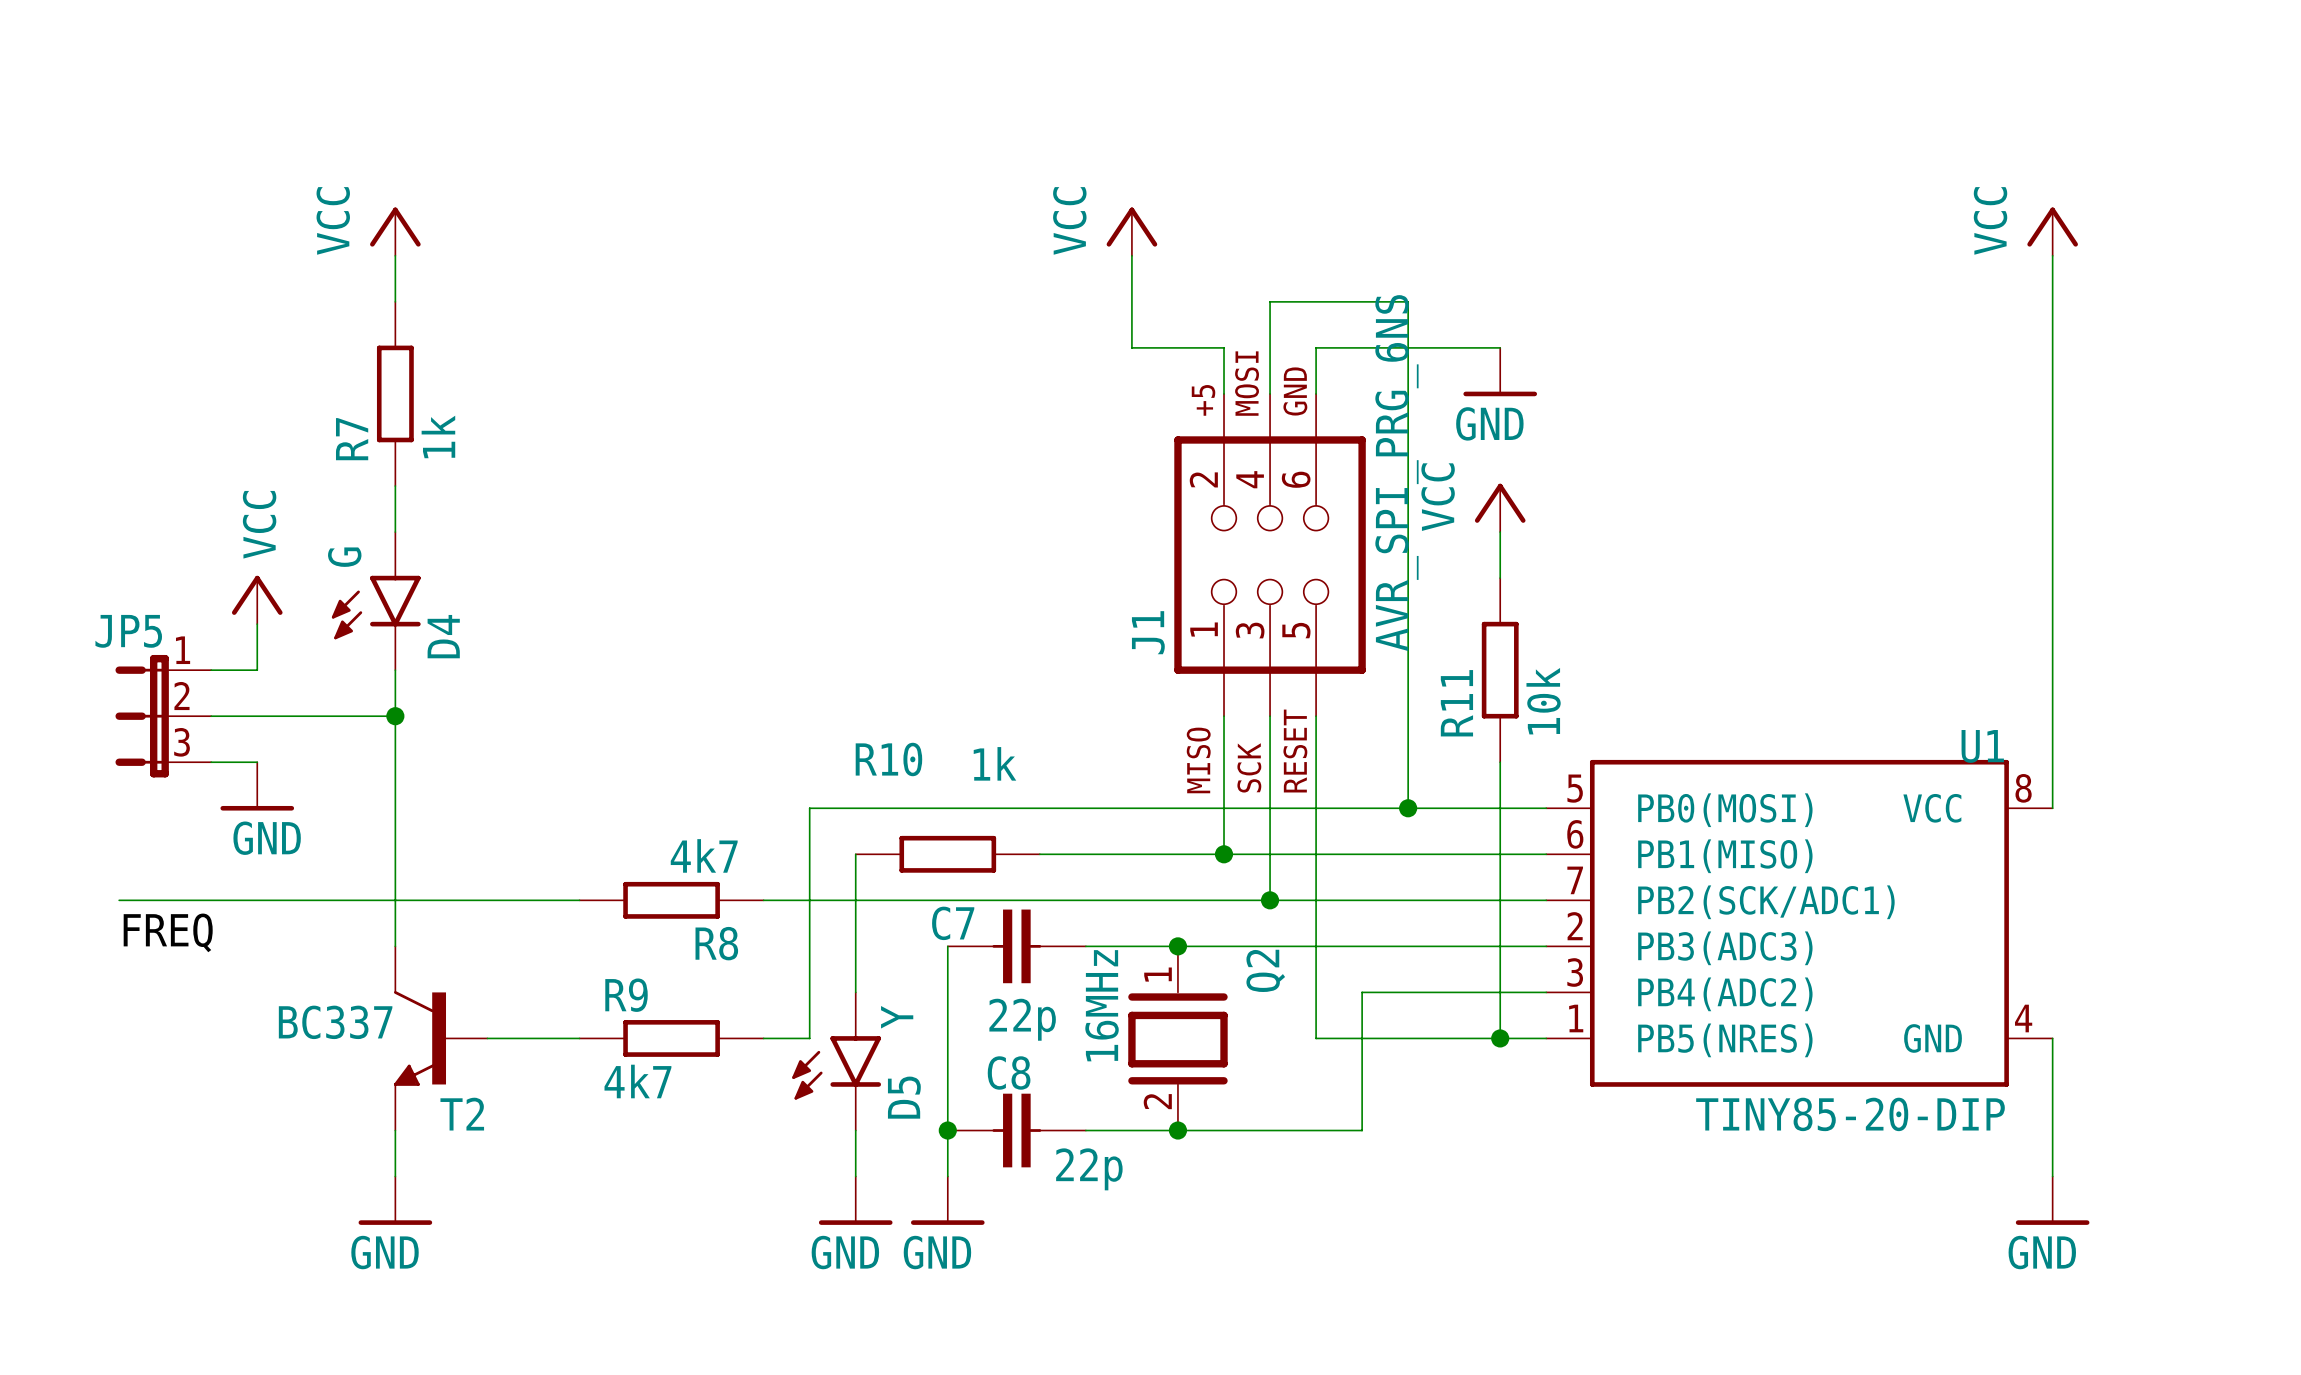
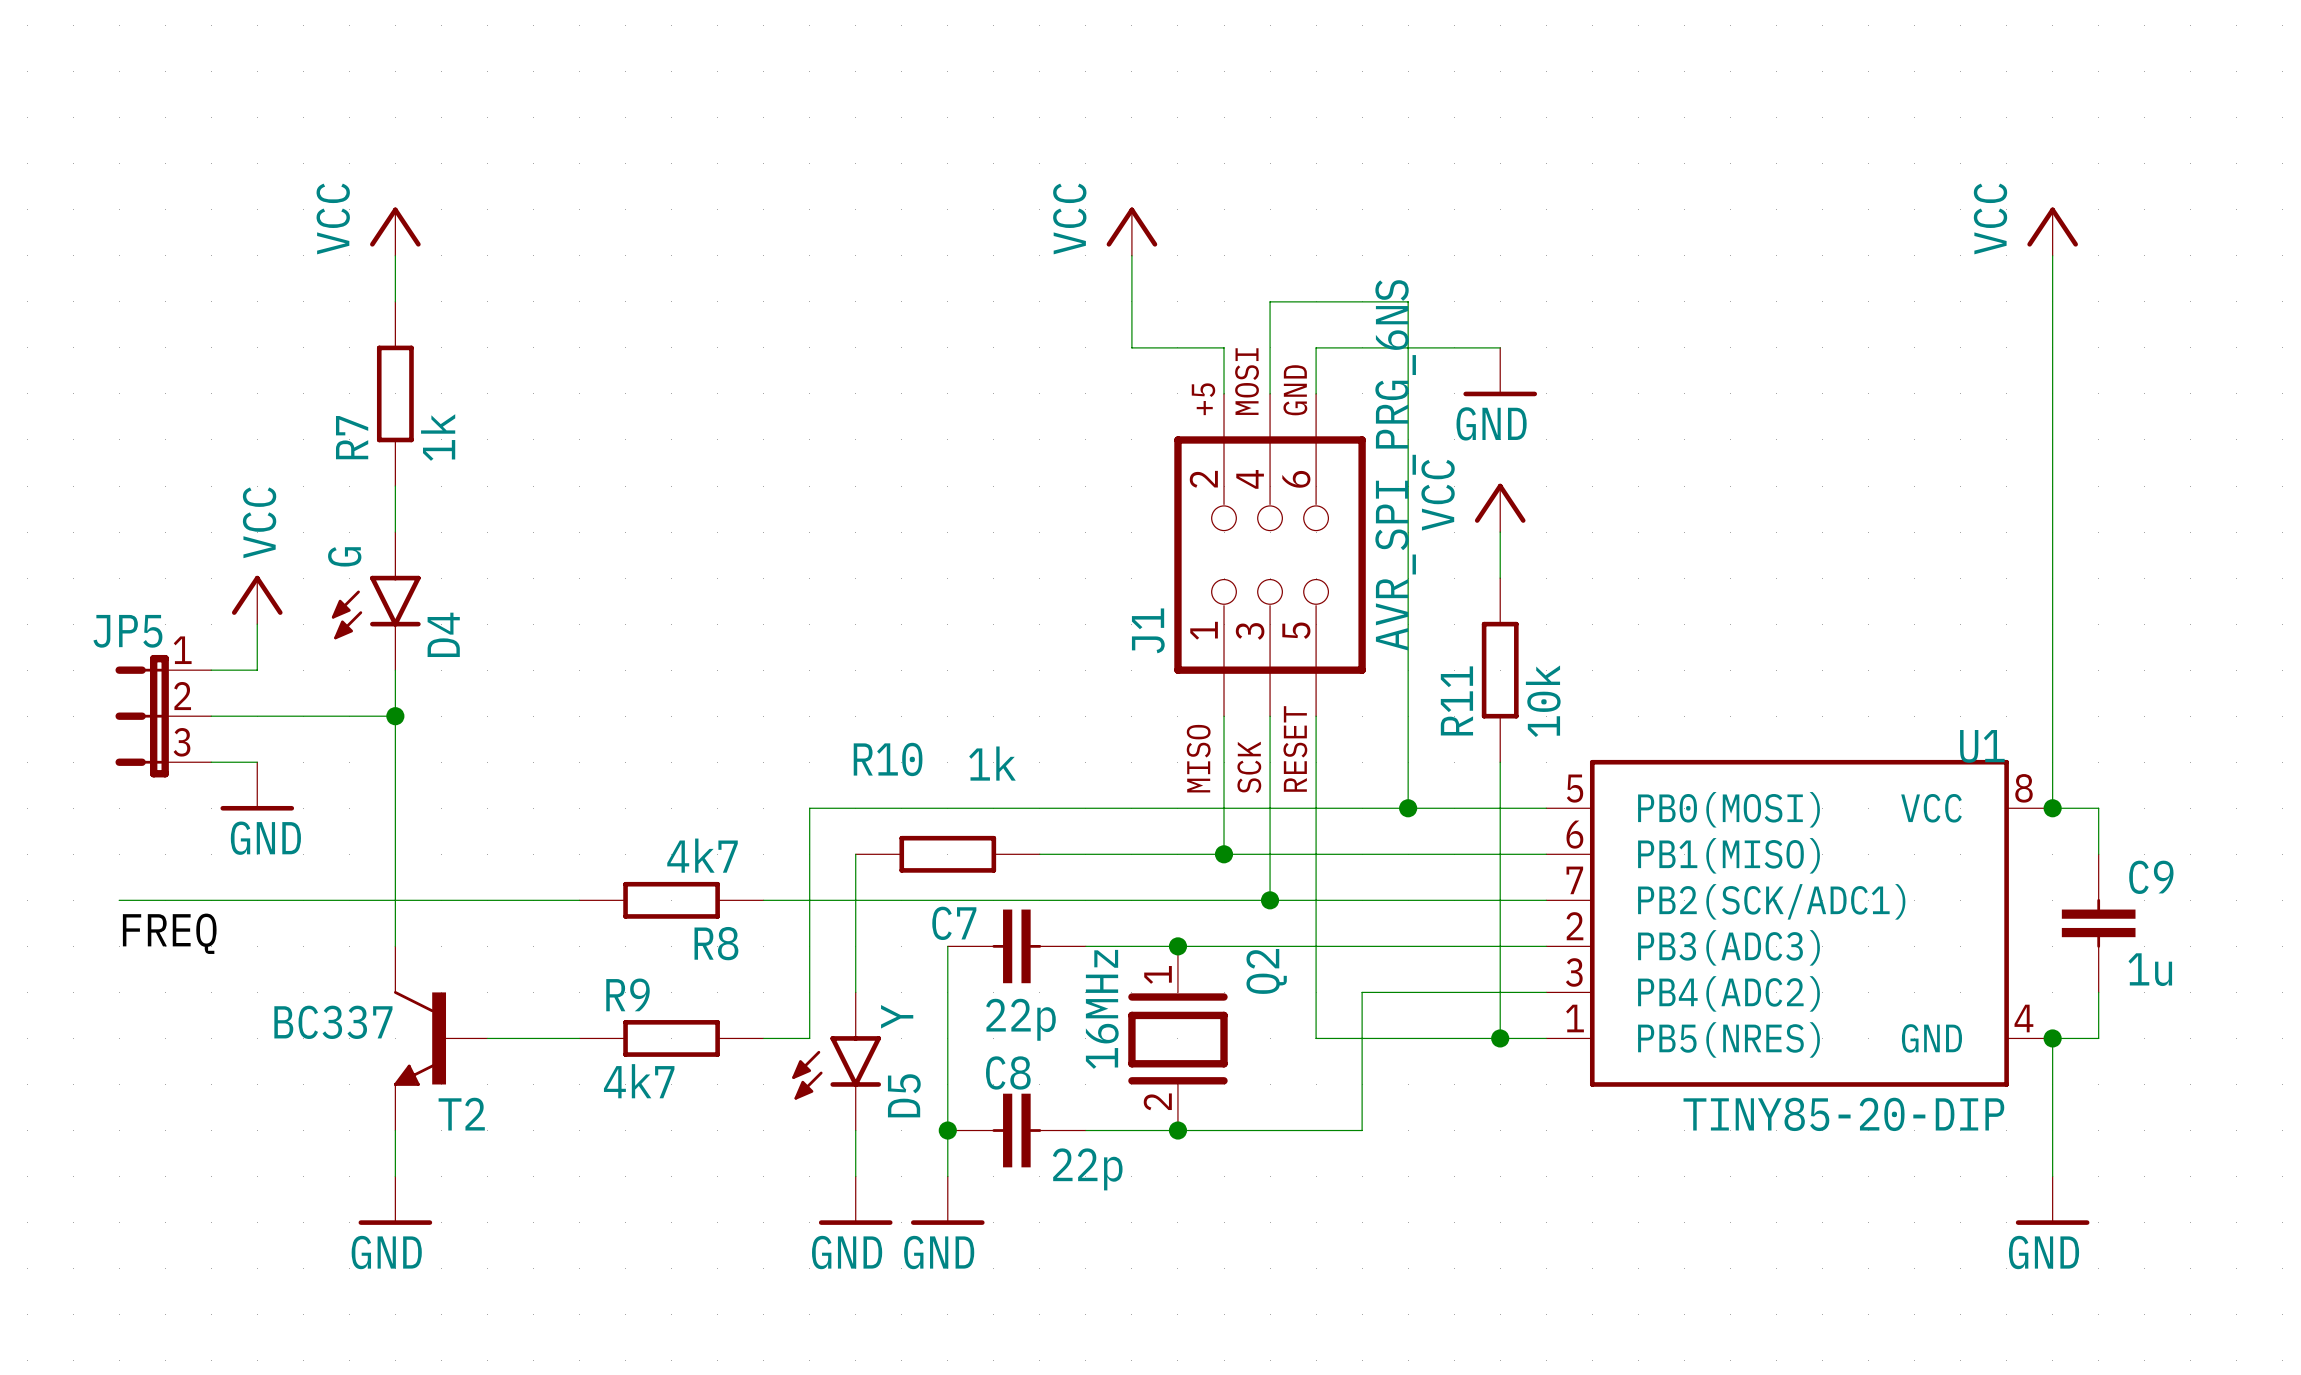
wire: none -> (2052, 808) (2098, 808) (2098, 854)
junction: none -> (2052, 808)
C9: none -> 1u (2098, 923)
wire: none -> (2098, 992) (2098, 1038) (2052, 1038)
junction: none -> (2052, 1038)

